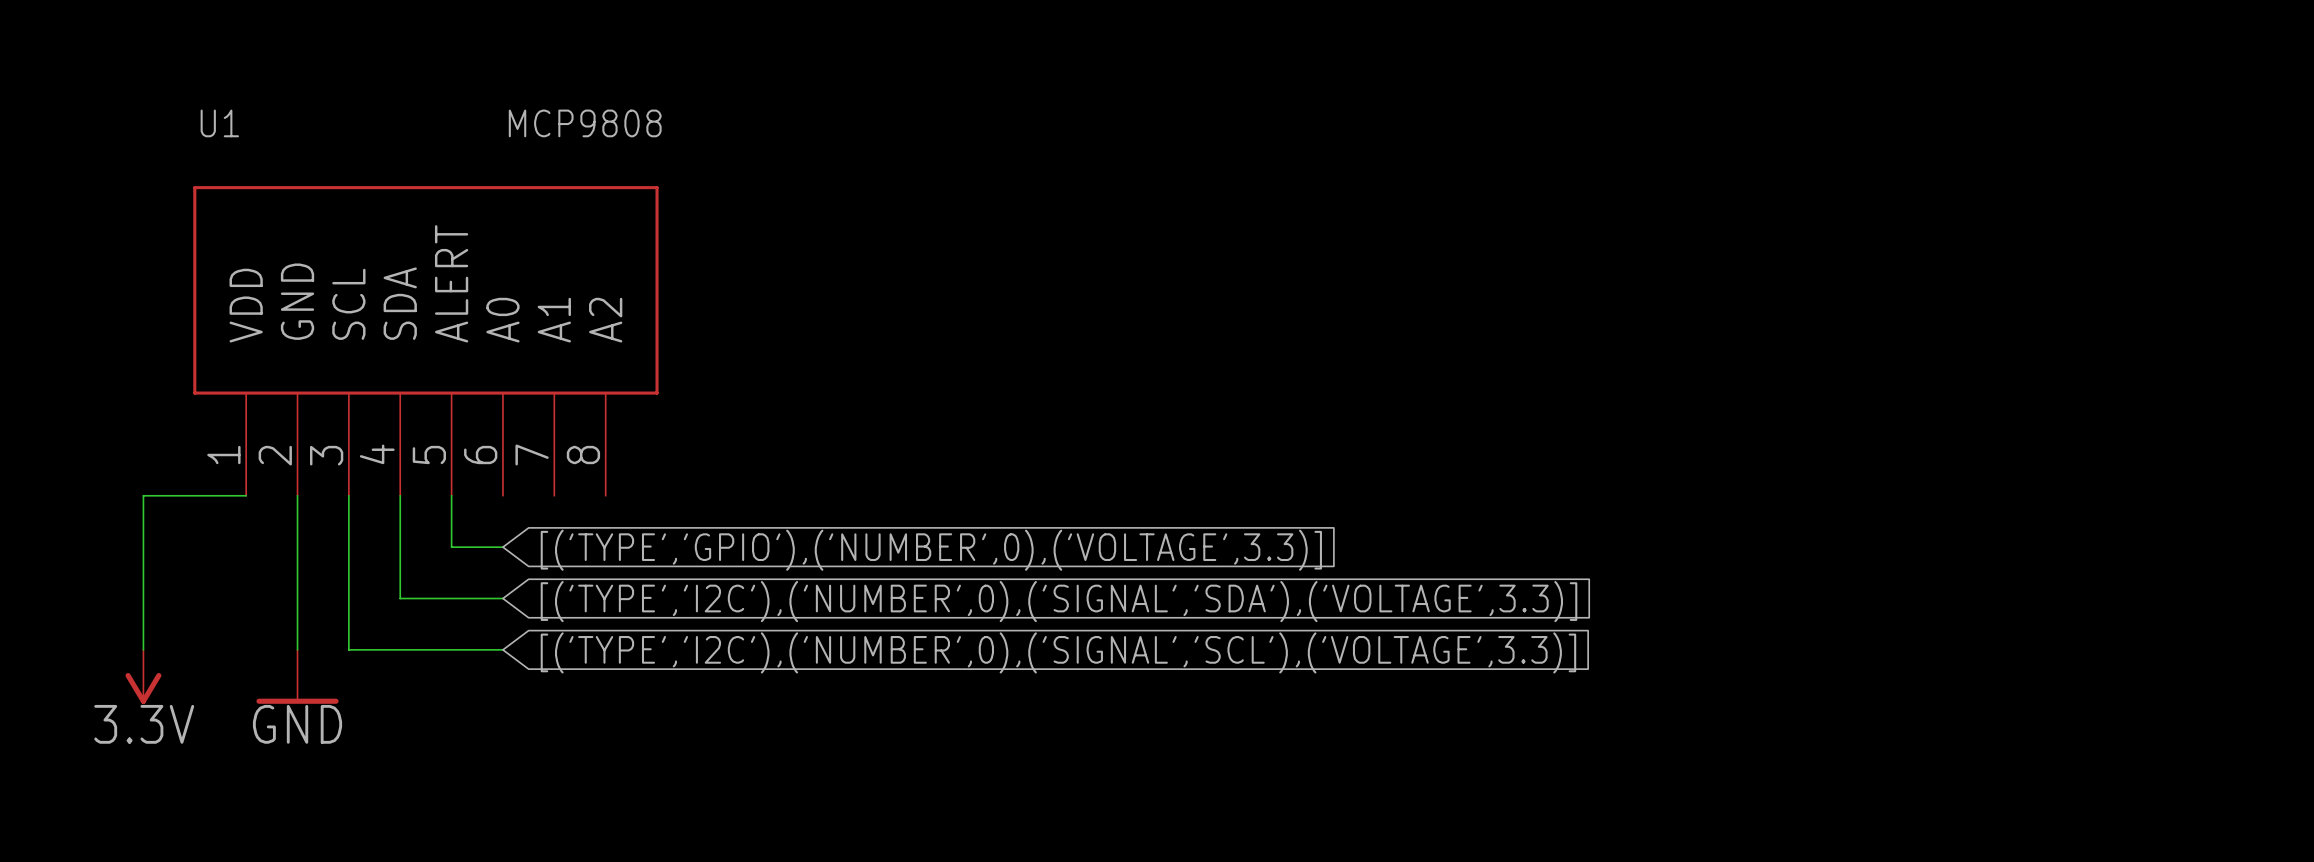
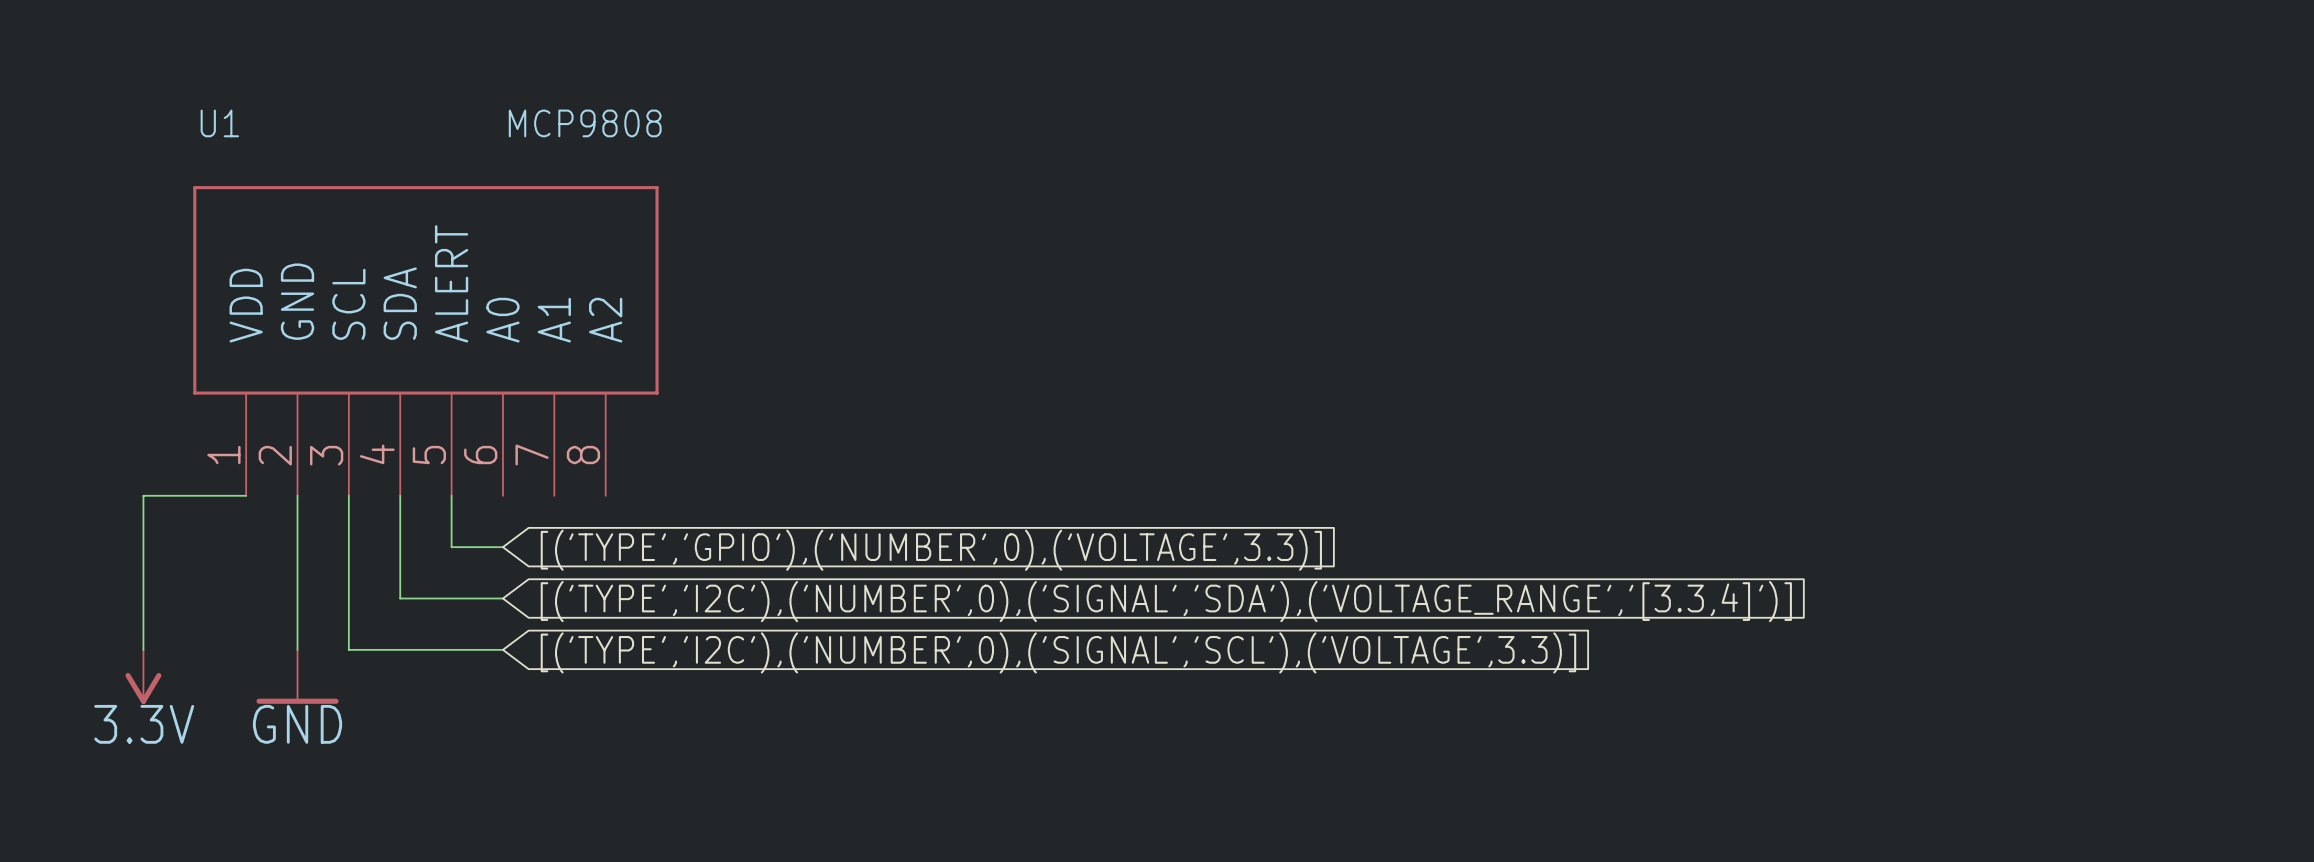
global label: [('TYPE','I2C'),('NUMBER',0),('SIGNAL','SDA'),('VOLTAGE',3.3)] (1059, 601) -> [('TYPE','I2C'),('NUMBER',0),('SIGNAL','SDA'),('VOLTAGE_RANGE','[3.3,4]')] (1166, 601)

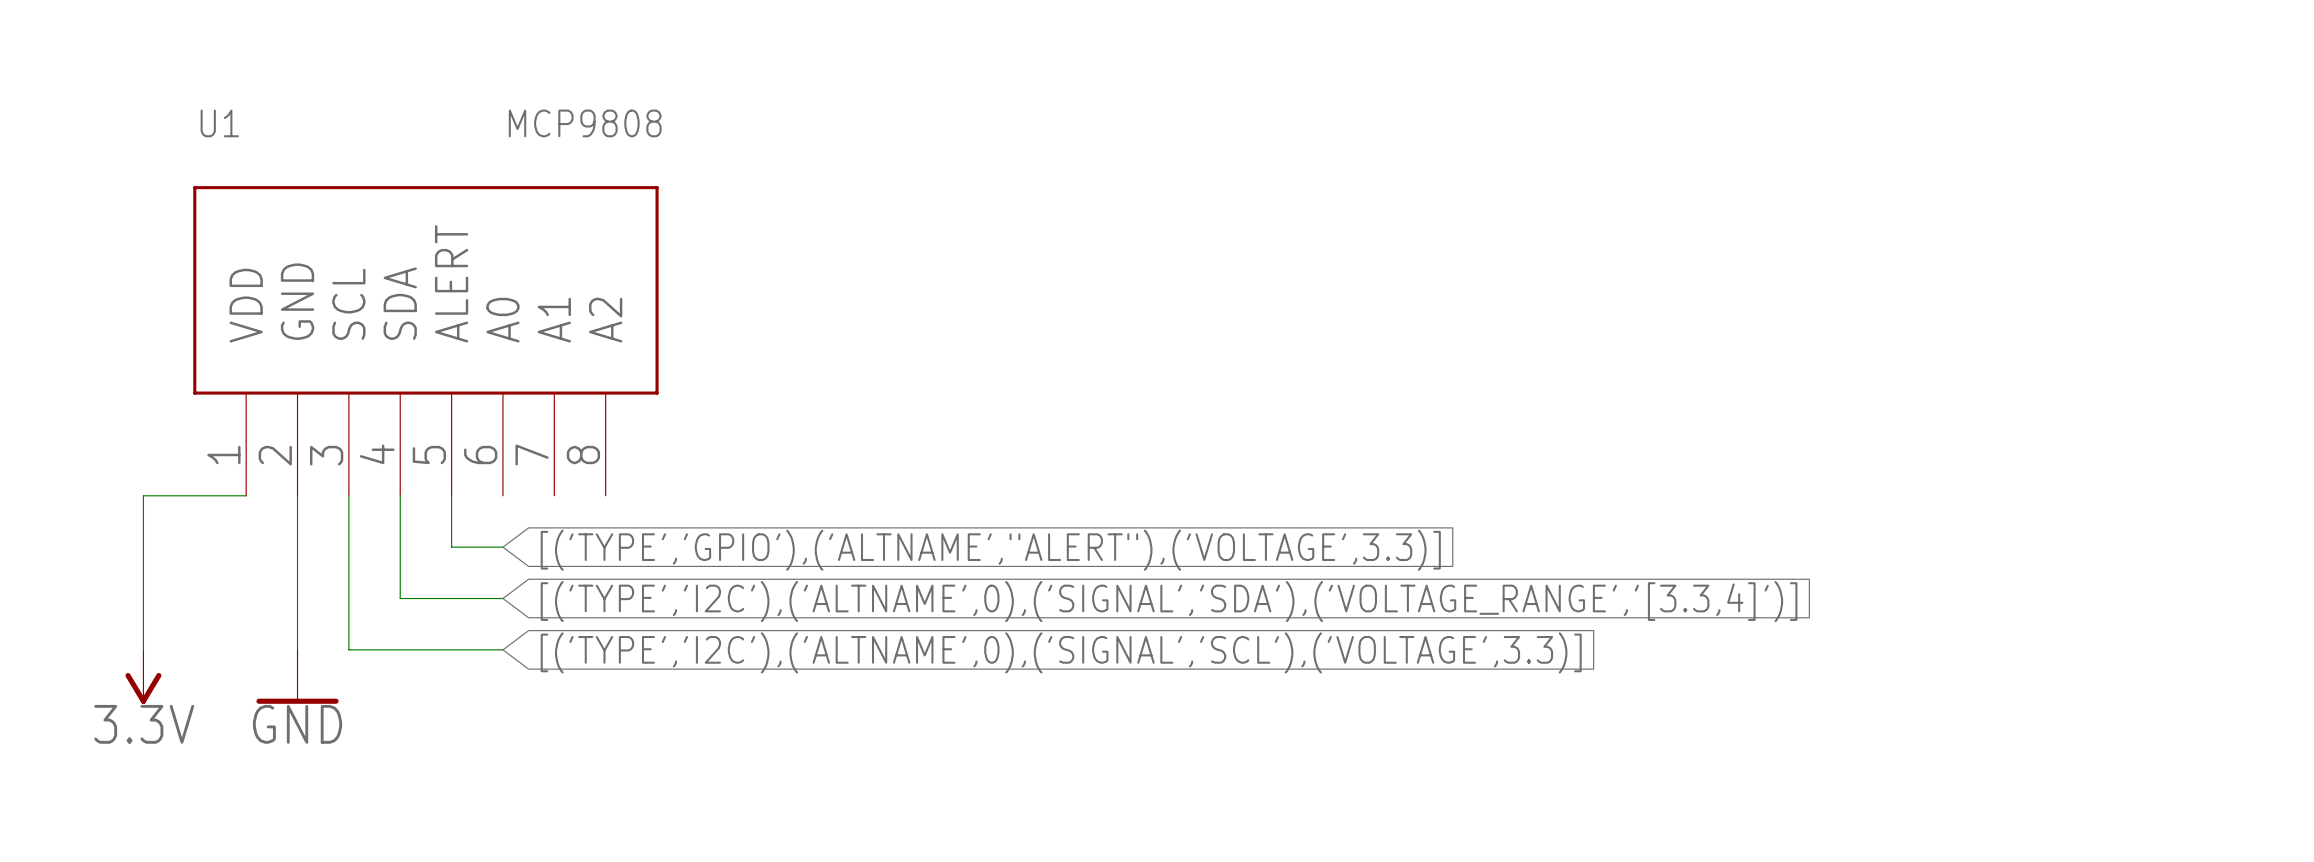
global label: [('TYPE','GPIO'),('NUMBER',0),('VOLTAGE',3.3)] (931, 550) -> [('TYPE','GPIO'),('ALTNAME',"ALERT"),('VOLTAGE',3.3)] (990, 550)
global label: [('TYPE','I2C'),('NUMBER',0),('SIGNAL','SDA'),('VOLTAGE_RANGE','[3.3,4]')] (1166, 601) -> [('TYPE','I2C'),('ALTNAME',0),('SIGNAL','SDA'),('VOLTAGE_RANGE','[3.3,4]')] (1169, 601)
global label: [('TYPE','I2C'),('NUMBER',0),('SIGNAL','SCL'),('VOLTAGE',3.3)] (1058, 652) -> [('TYPE','I2C'),('ALTNAME',0),('SIGNAL','SCL'),('VOLTAGE',3.3)] (1061, 652)

